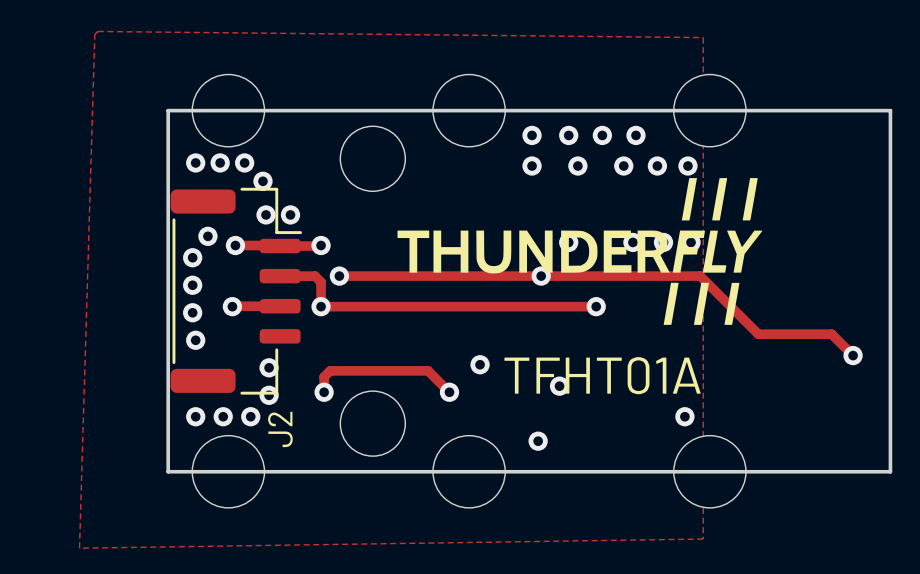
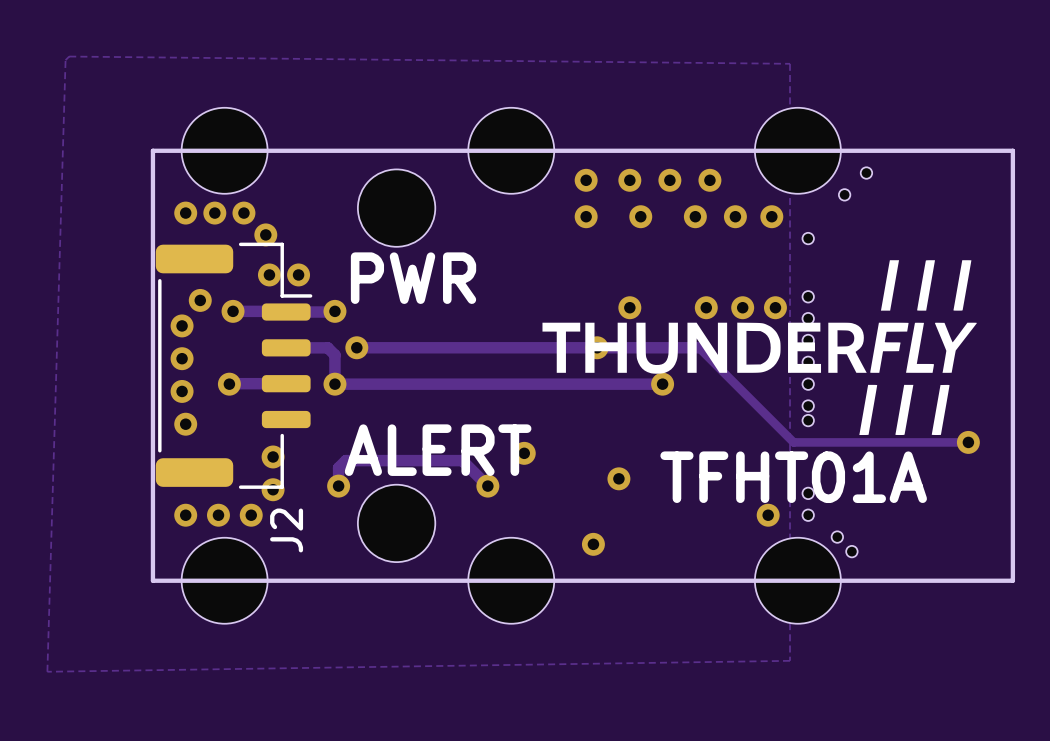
part: none -> (866, 173)
part: none -> (844, 194)
part: none -> (808, 238)
text: none -> PWR (413, 278)
part: none -> (808, 296)
drawing position: (579, 251) -> (759, 347)
part: none -> (808, 318)
part: none -> (808, 340)
track: (626, 276) (700, 276) (758, 334) (831, 334) (853, 355) -> (699, 347) (793, 442) (968, 442)
part: none -> (808, 362)
part: none -> (808, 384)
part: none -> (808, 406)
part: none -> (808, 420)
text: none -> ALERT (438, 450)
text position: TFHT01A (602, 375) -> TFHT01A (793, 477)
part: none -> (808, 493)
part: none -> (808, 515)
part: none -> (837, 537)
part: none -> (851, 551)

